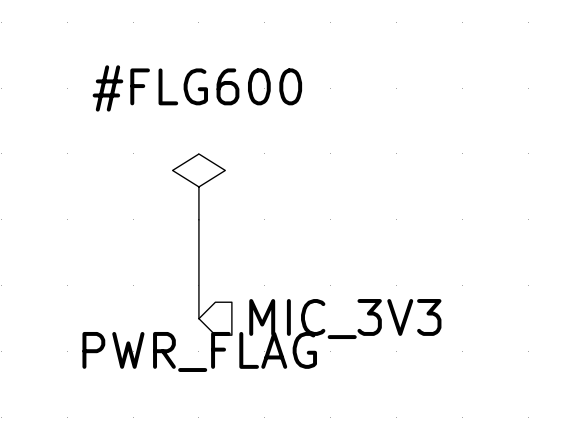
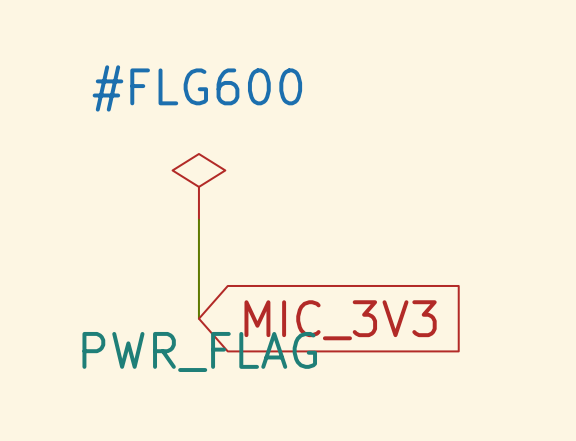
hierarchical label: MIC_3V3 (345, 319) -> none
global label: none -> MIC_3V3 (340, 320)

